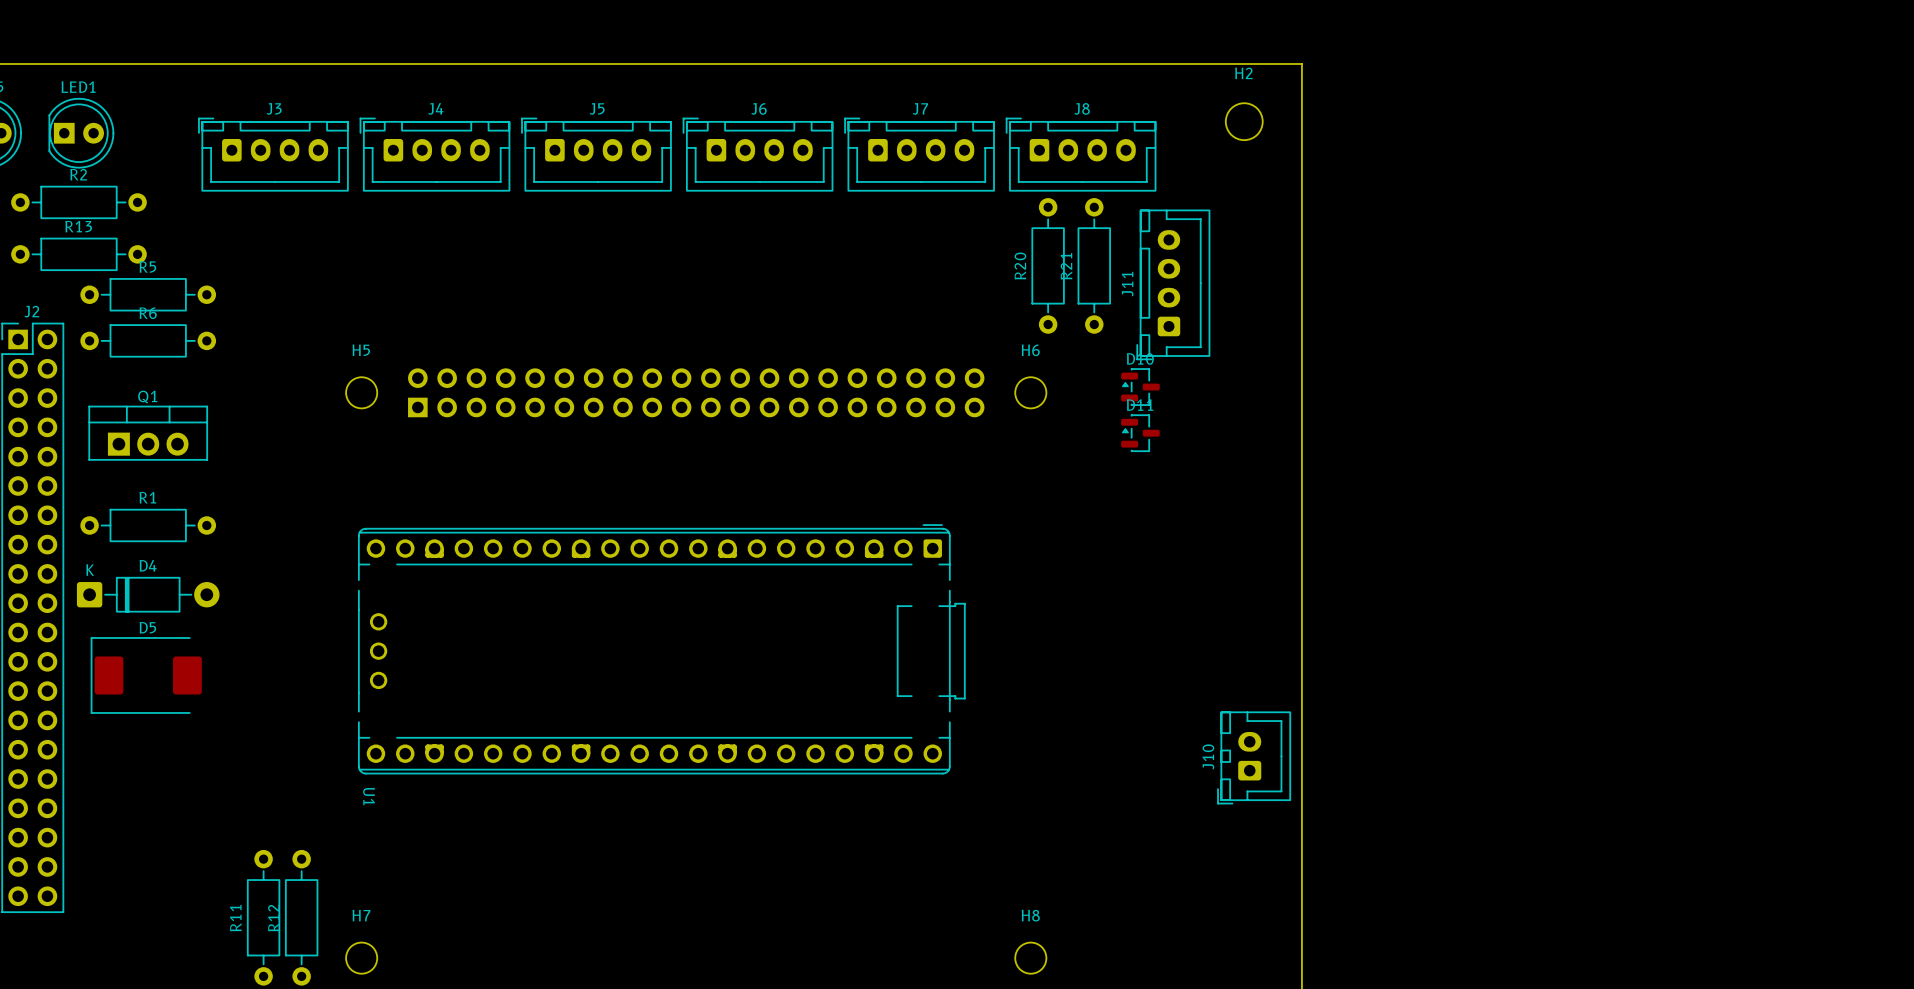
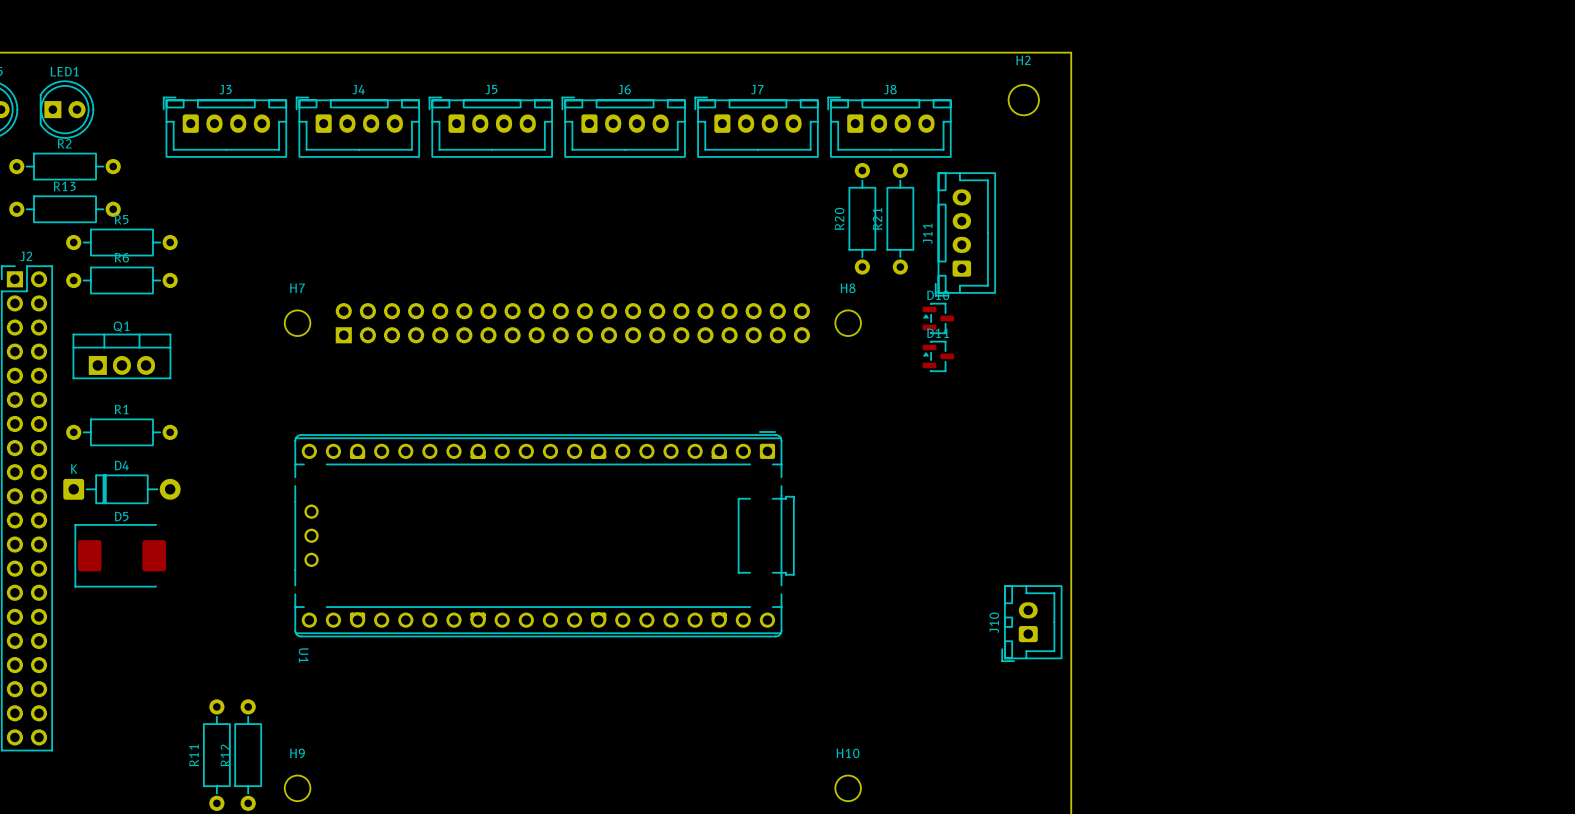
H5 name: H5 (361, 350) -> H7 (297, 288)
H6 name: H6 (1030, 350) -> H8 (848, 288)
H7 name: H7 (361, 915) -> H9 (297, 753)
H8 name: H8 (1030, 915) -> H10 (848, 753)

